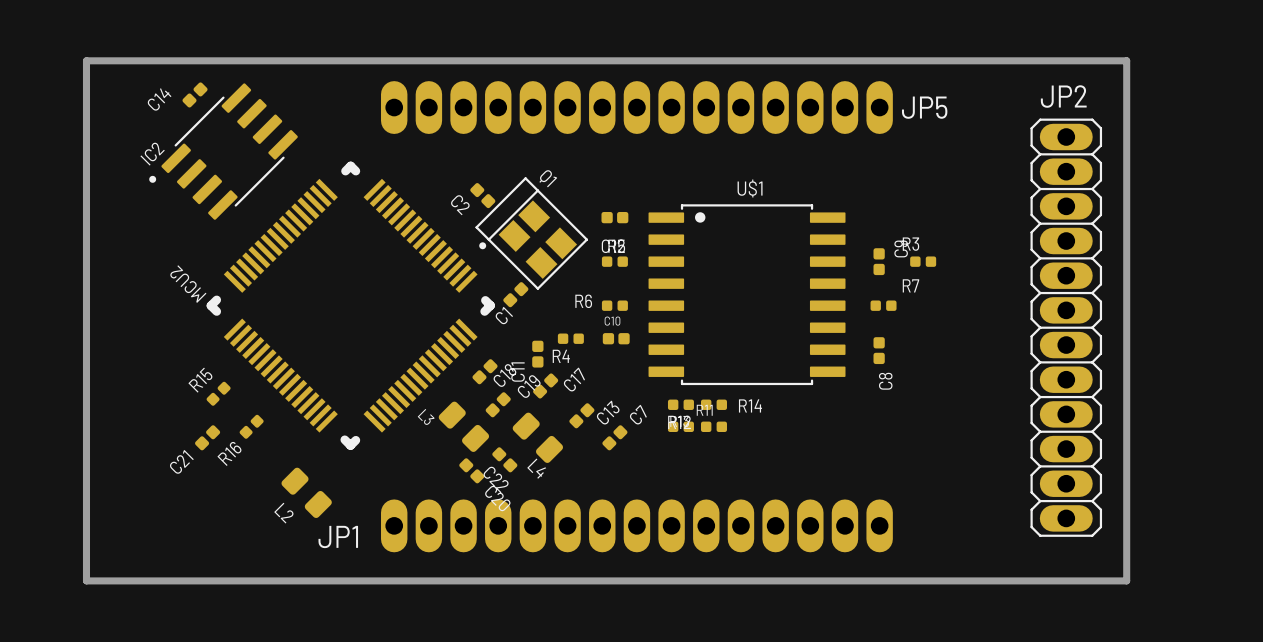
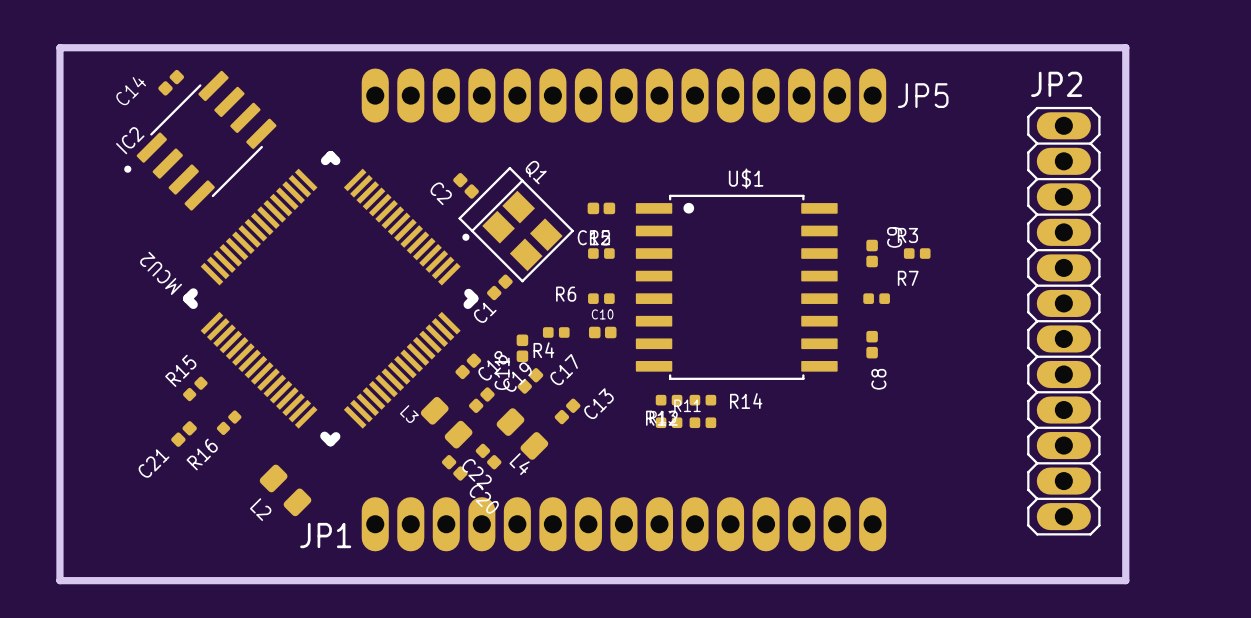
C7: (614, 437) -> none

